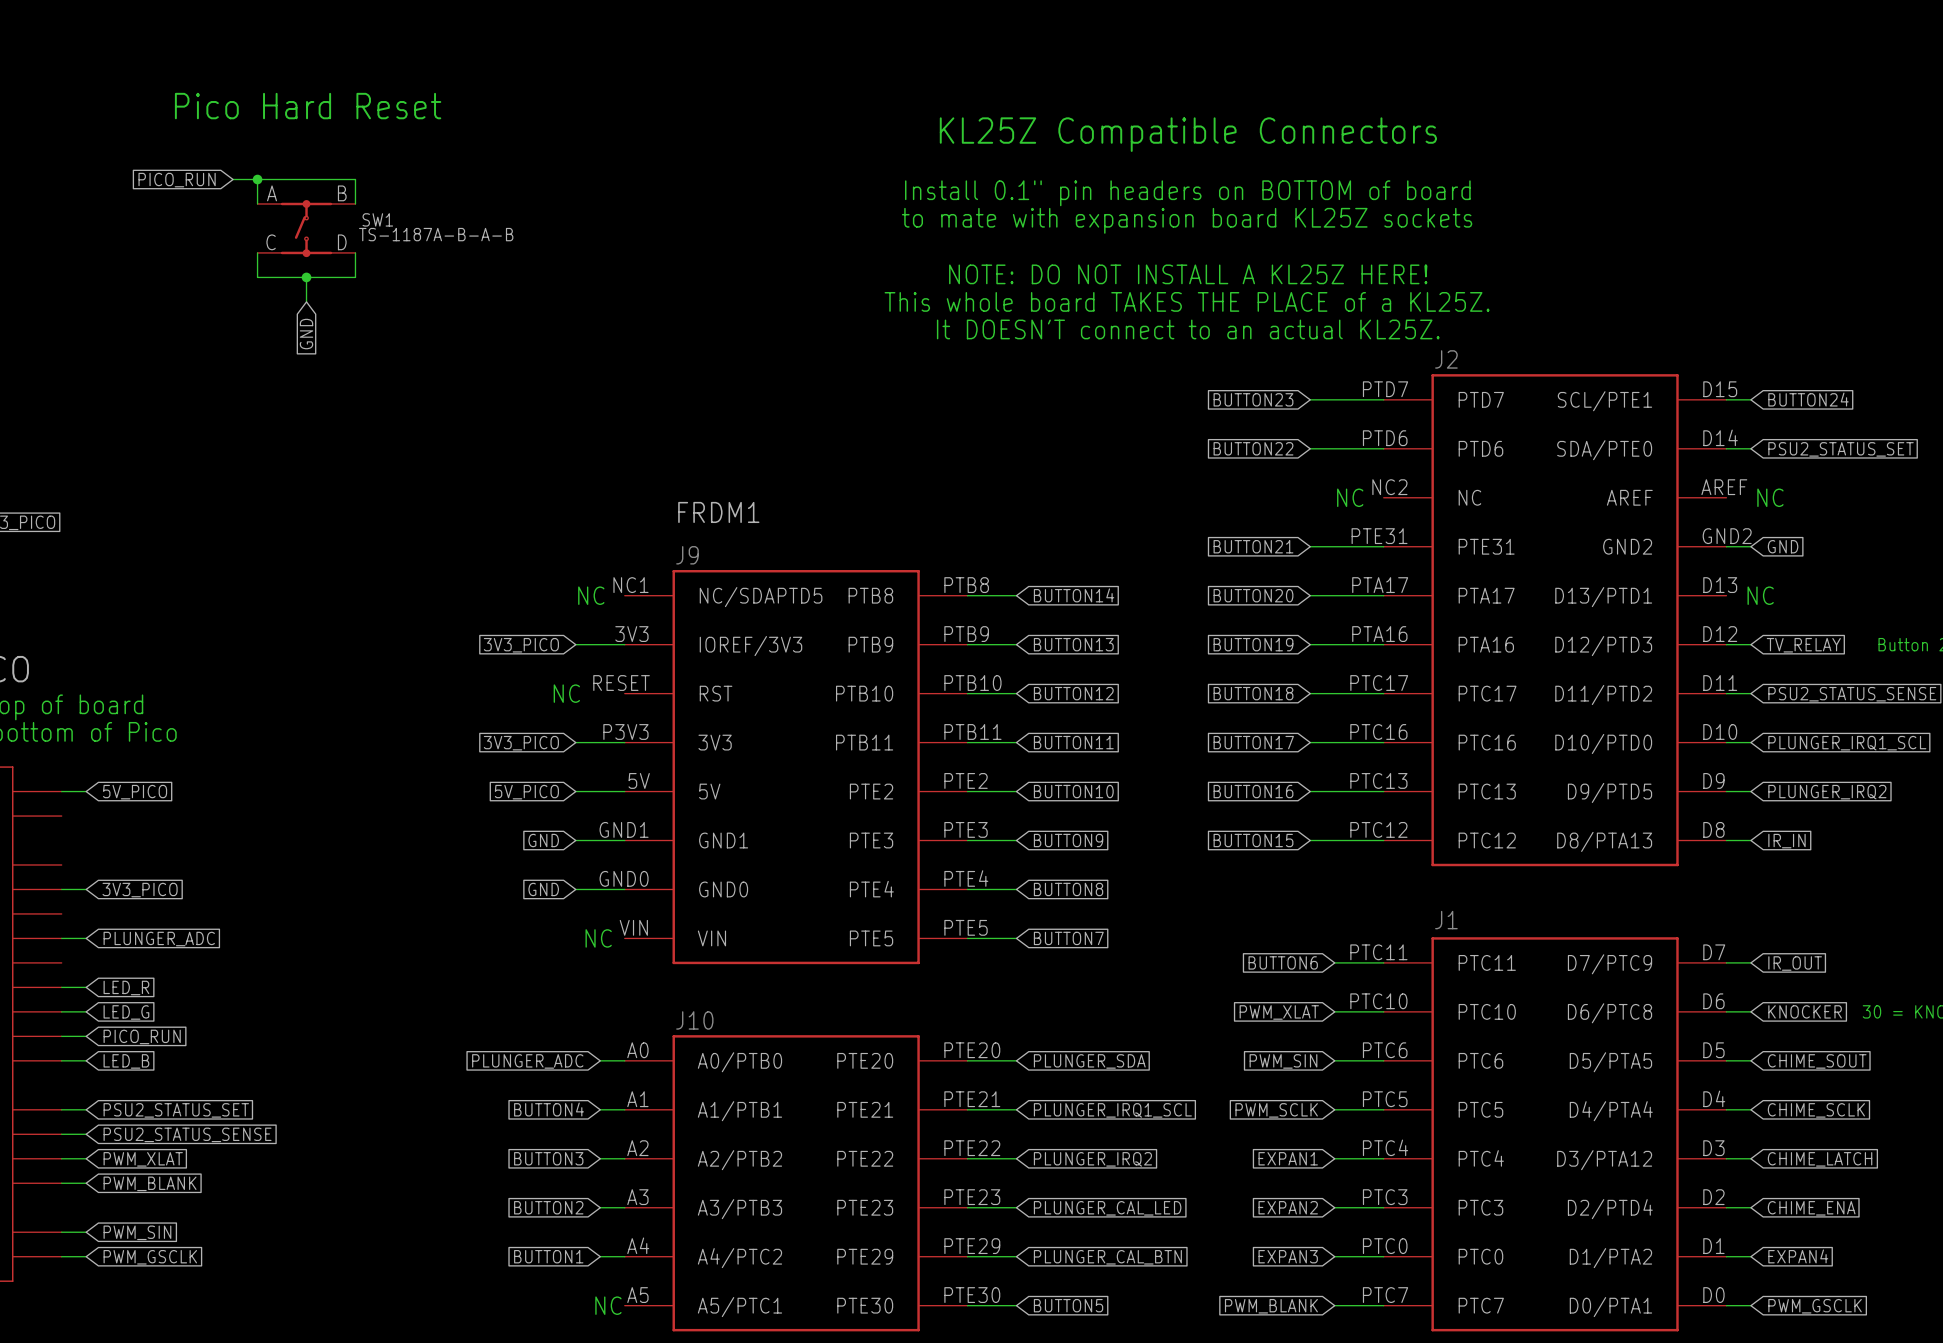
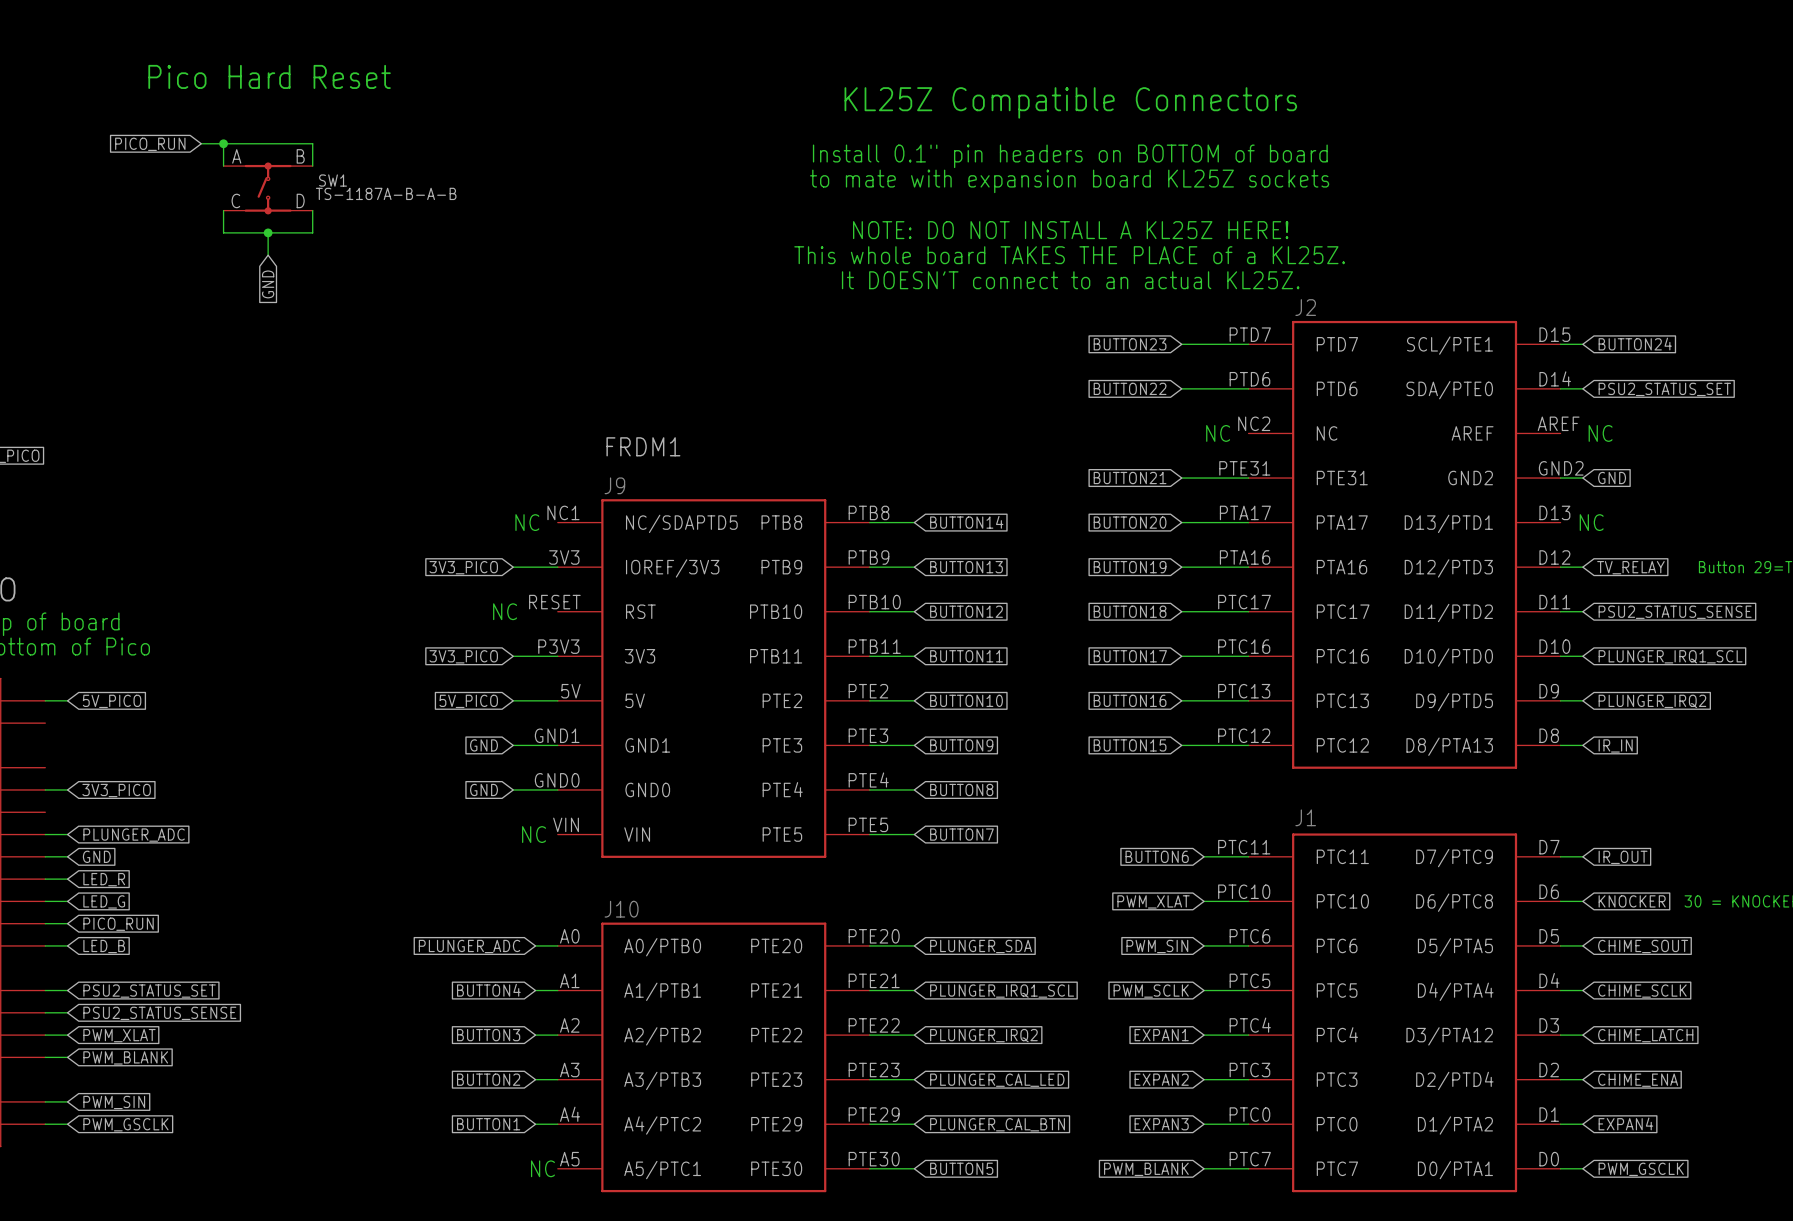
wire: none -> (45, 856) (67, 856)
global label: none -> GND (96, 856)

